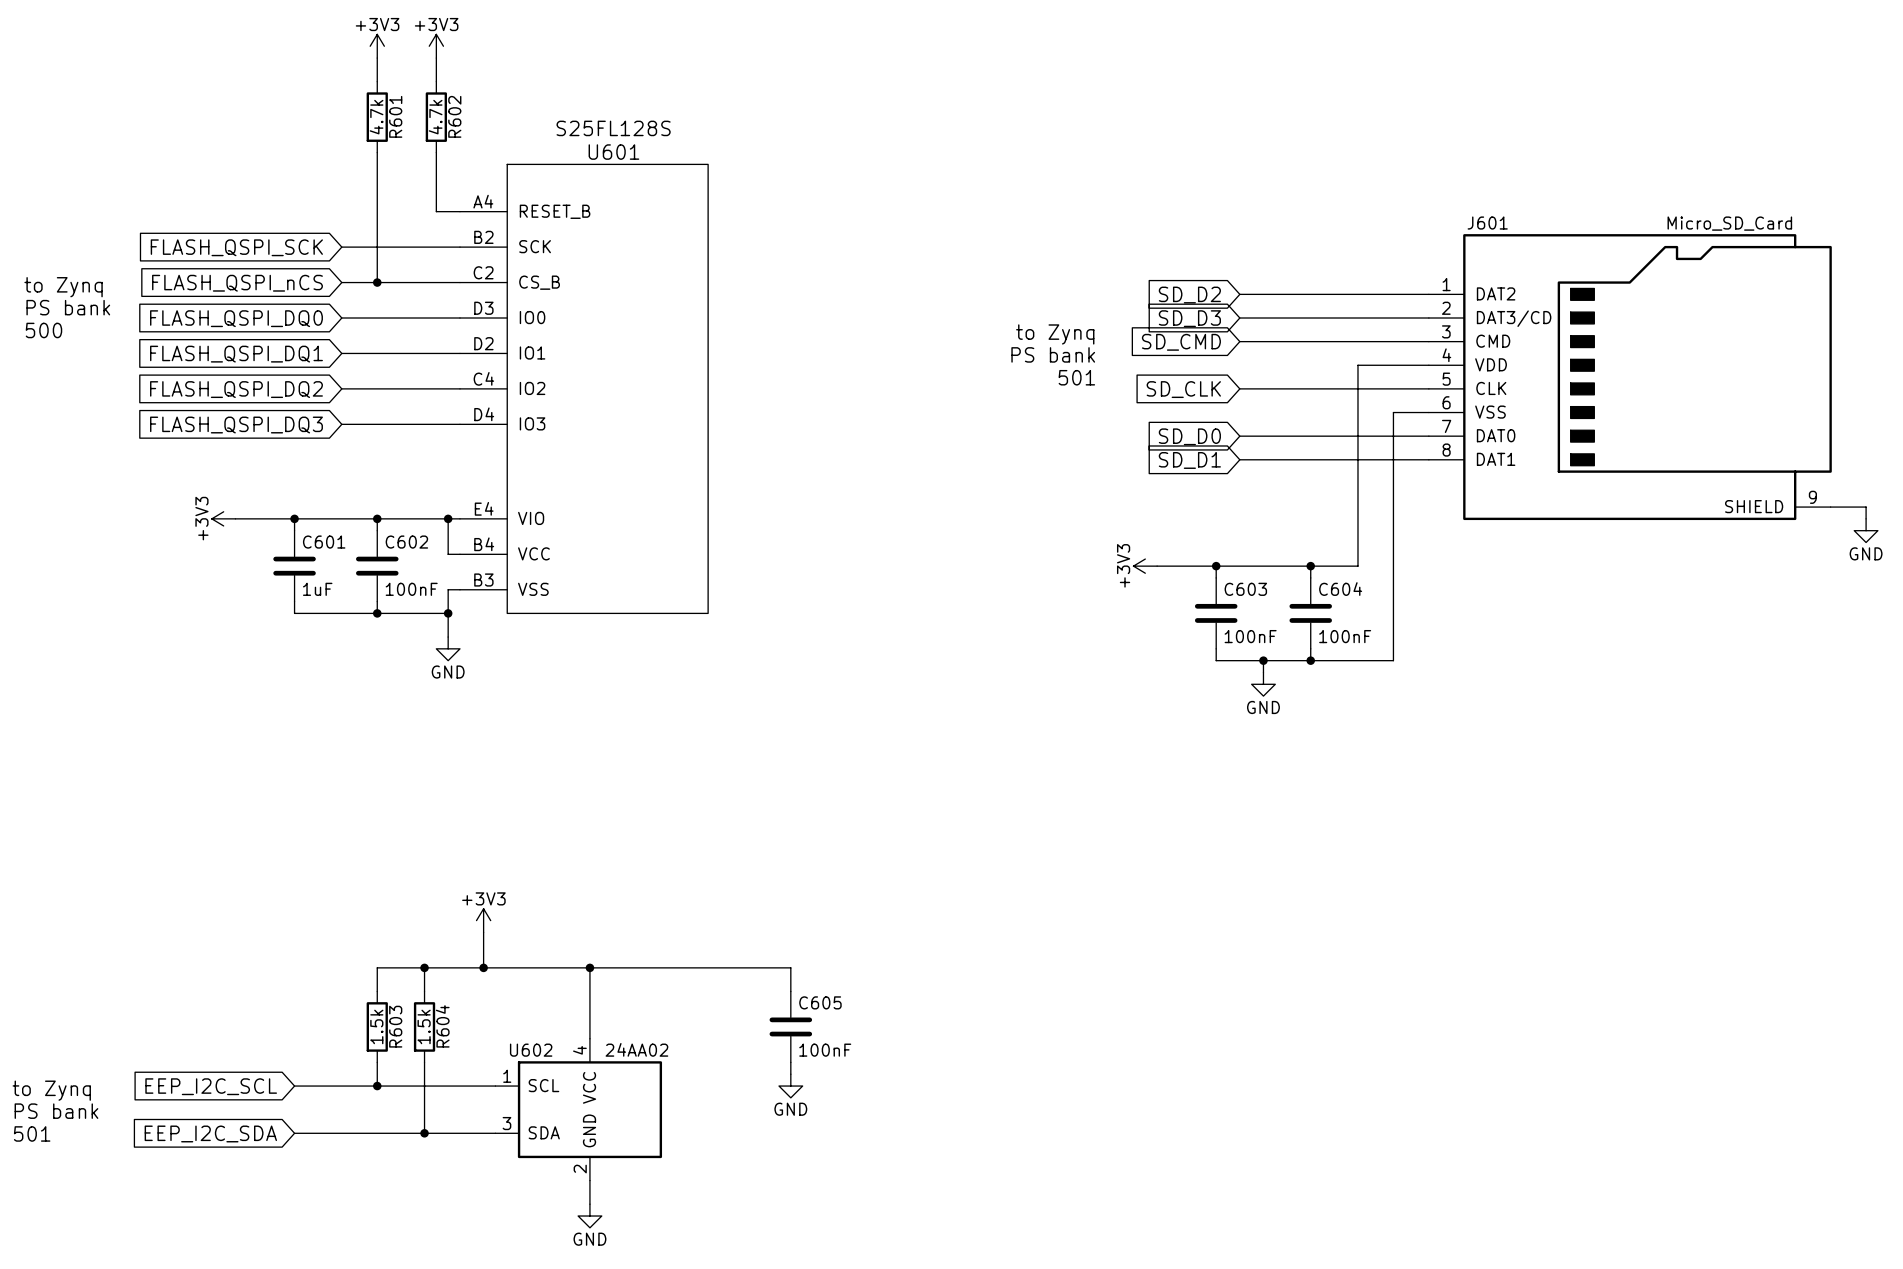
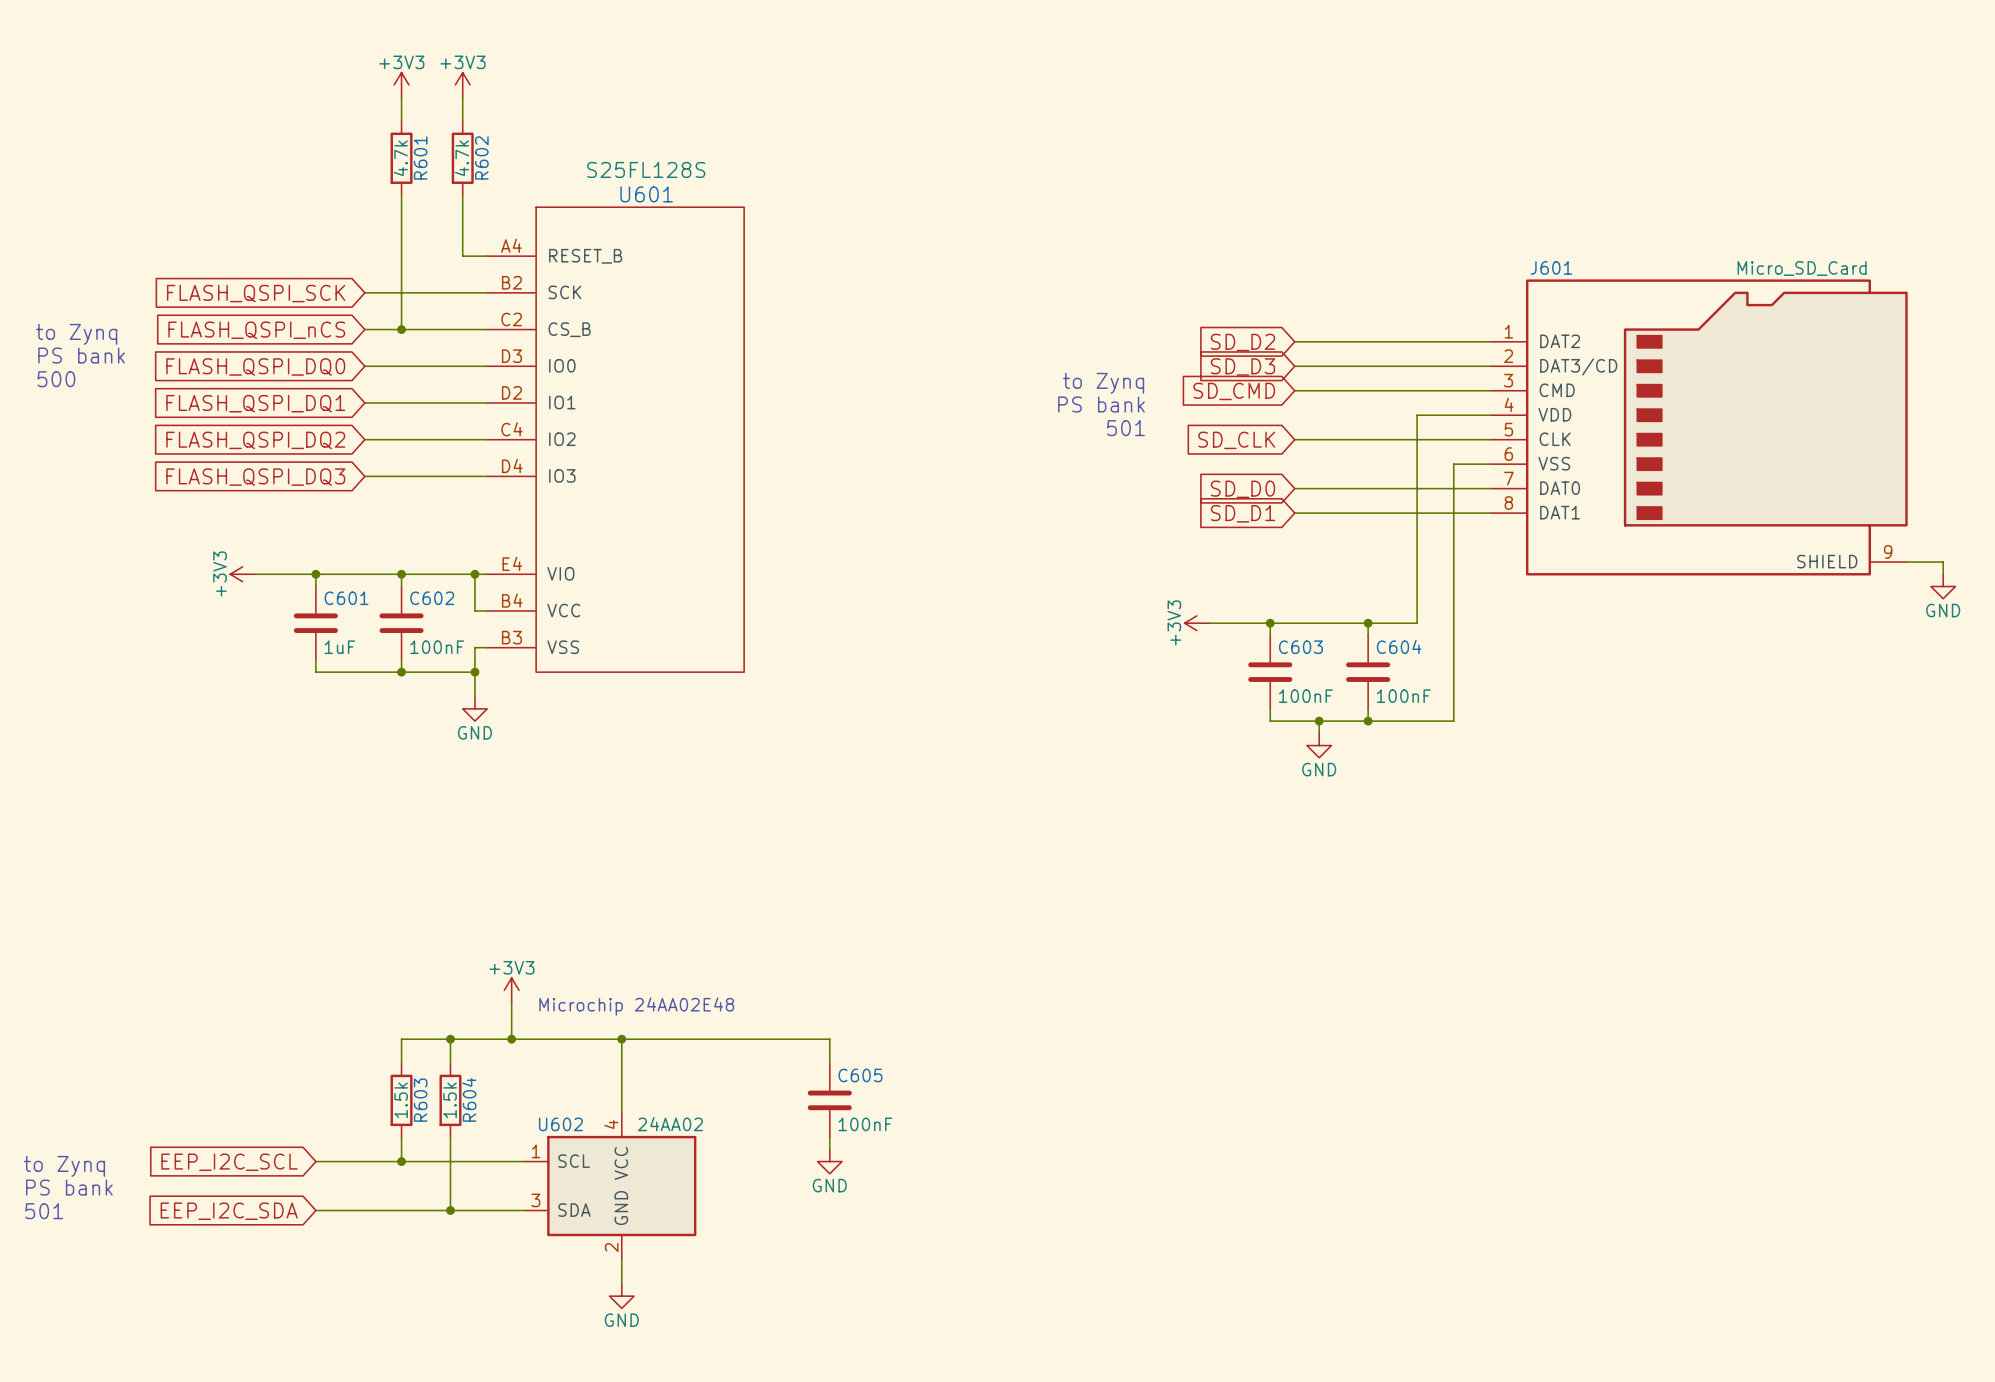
text: none -> Microchip 24AA02E48 (636, 1006)

